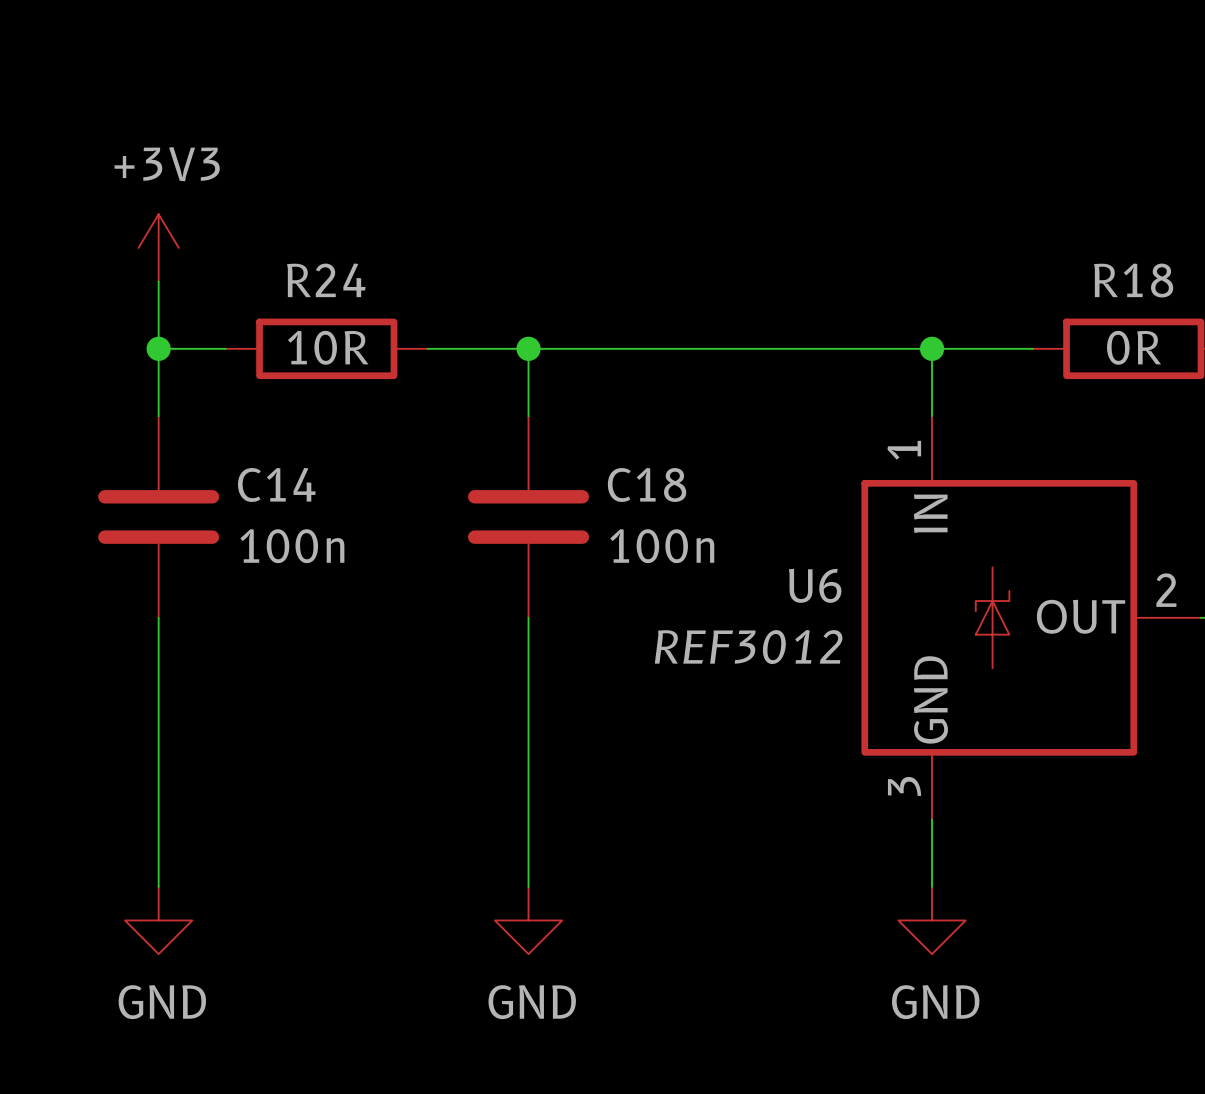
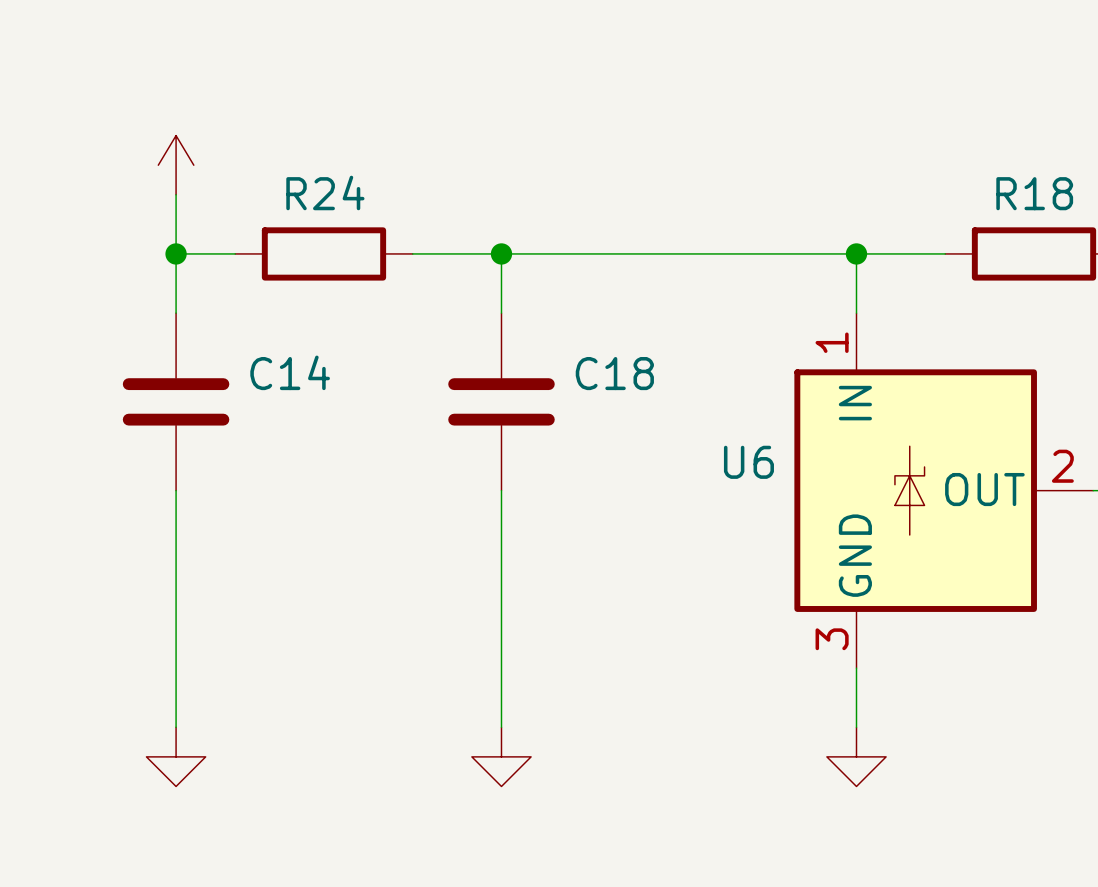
power symbol text: +3V3 (167, 164) -> none
R24 value: 10R (328, 347) -> none
R18 value: 0R (1134, 347) -> none
C14 value: 100n (292, 546) -> none
C18 value: 100n (662, 546) -> none
U6 value: REF3012 (748, 647) -> none
power symbol text: GND (162, 1002) -> none
power symbol text: GND (532, 1002) -> none
power symbol text: GND (935, 1002) -> none

